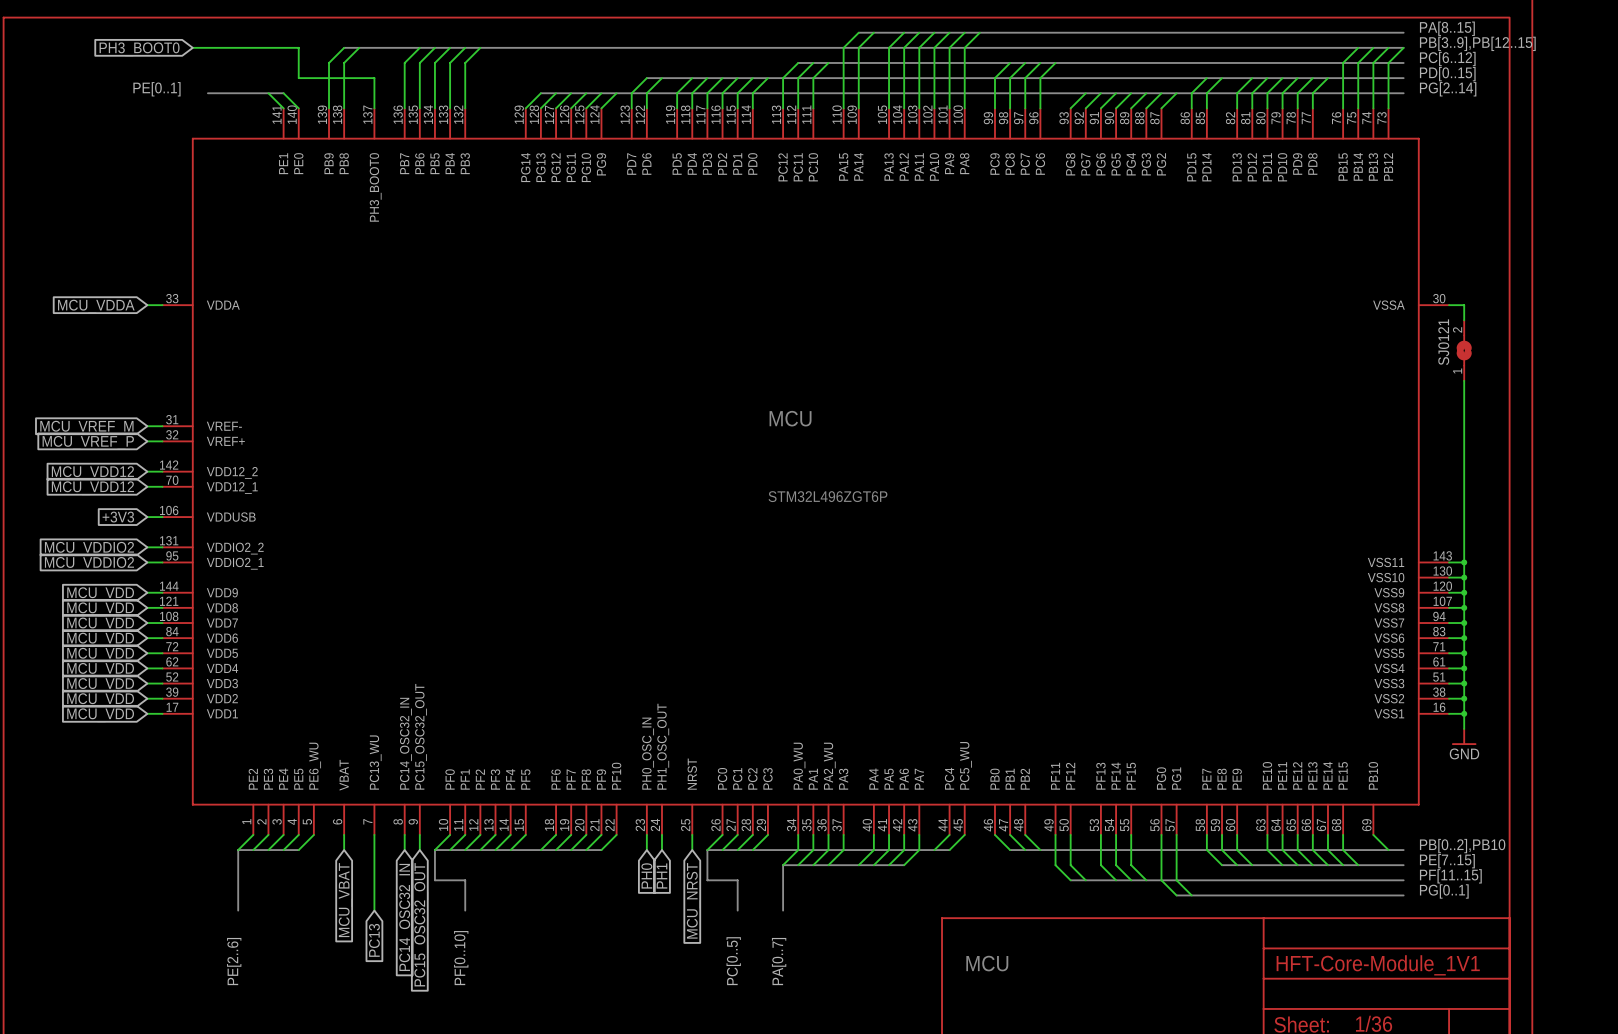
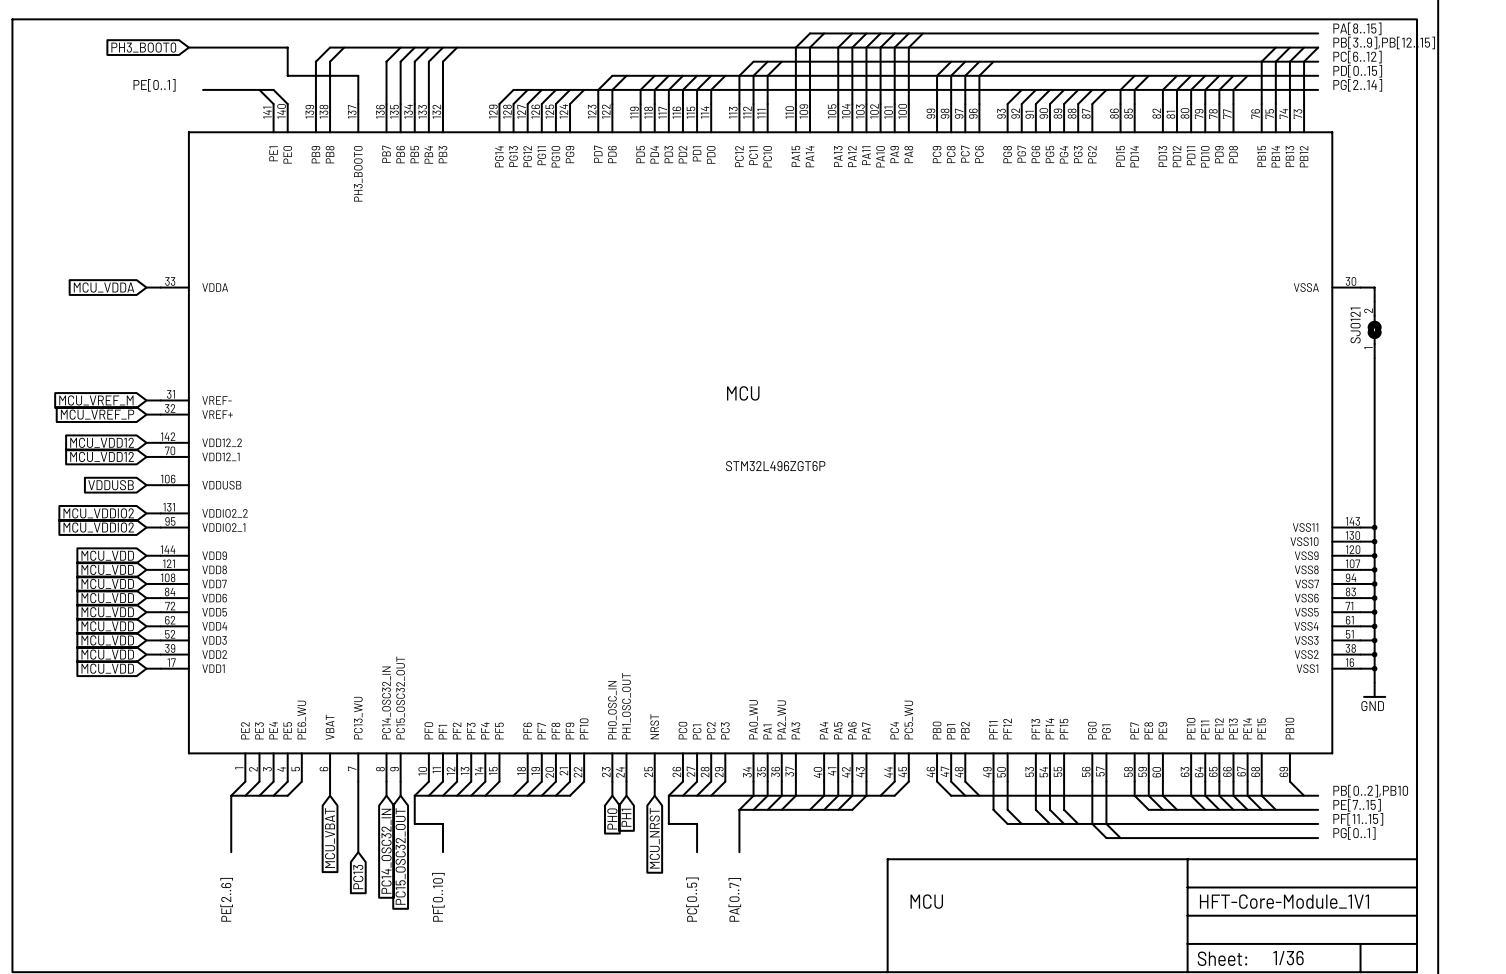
global label: +3V3 (118, 517) -> VDDUSB (111, 485)

